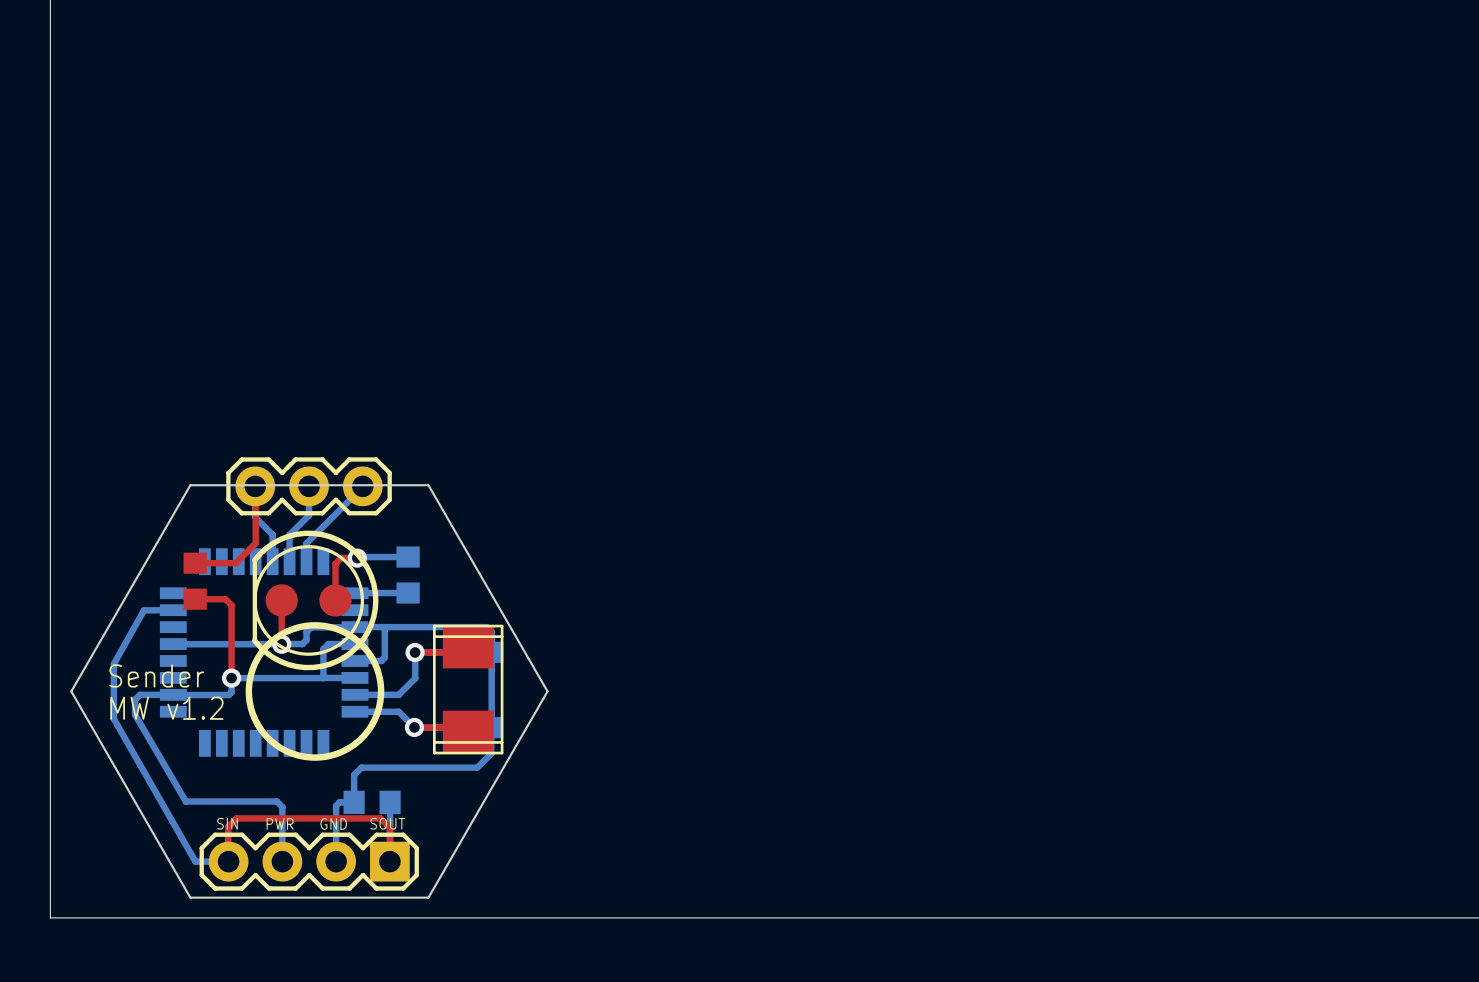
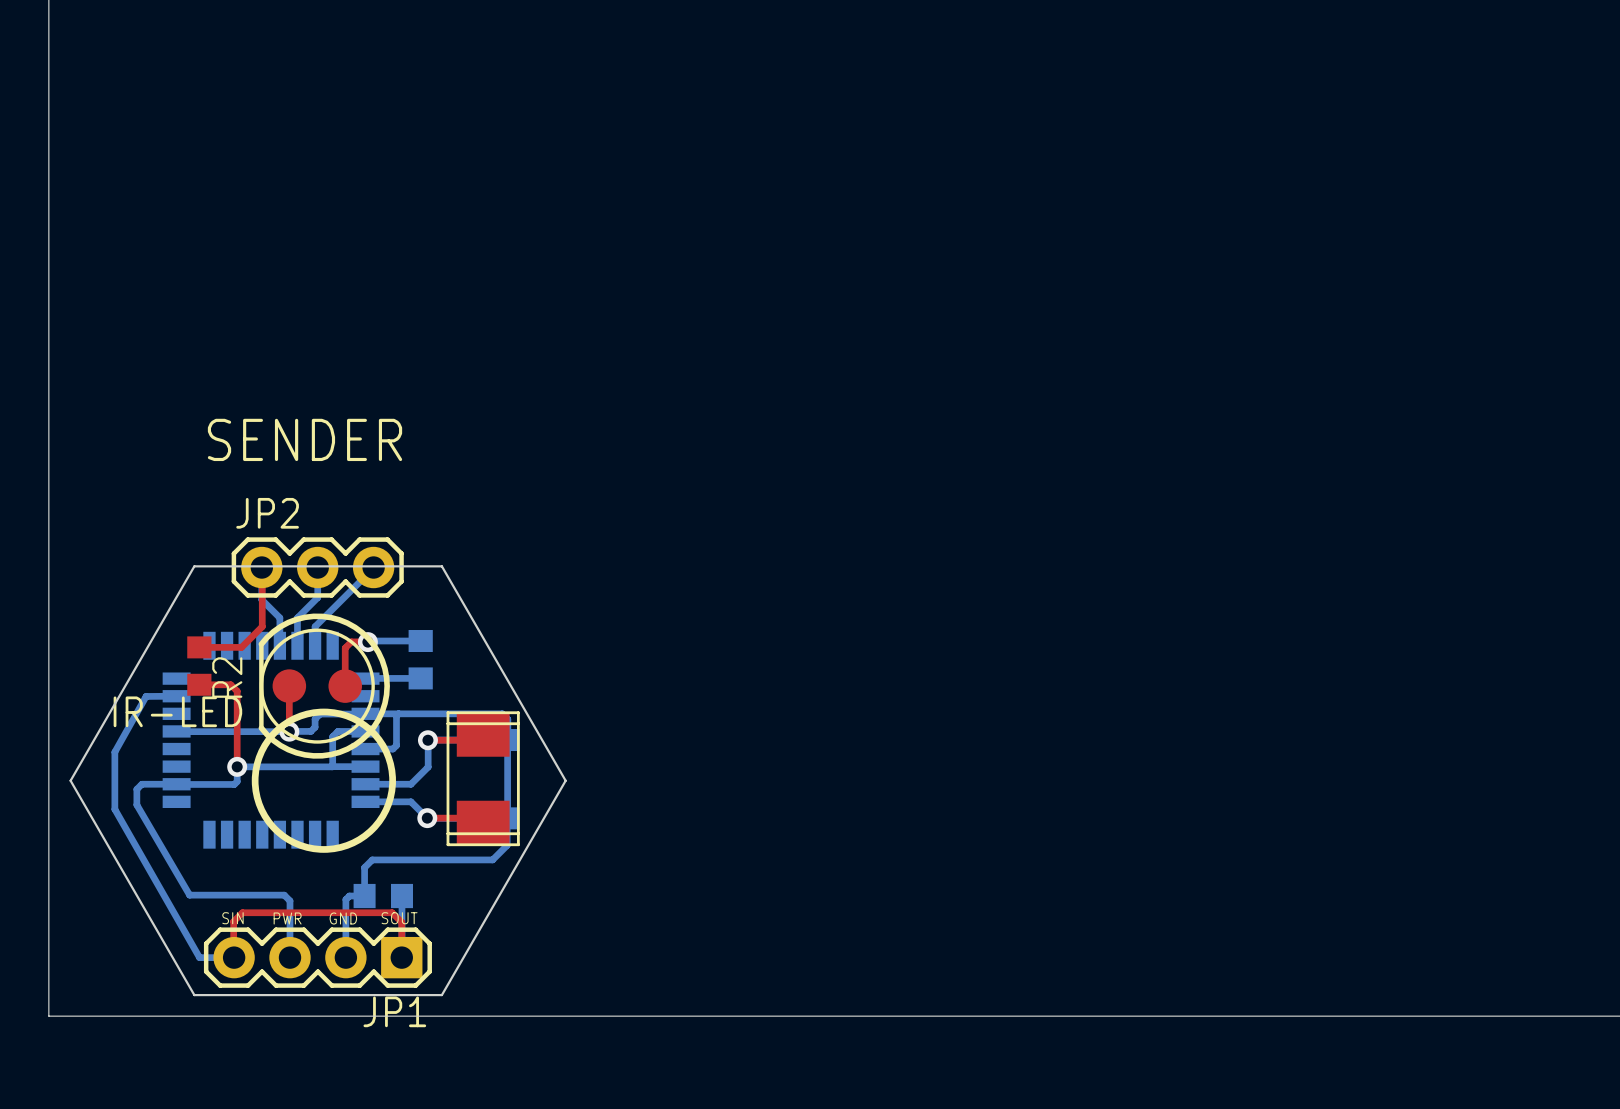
text: none -> SENDER (305, 439)
JP2 name: none -> JP2 (267, 513)
R2 name: none -> R2 (227, 677)
IR-LED name: none -> IR-LED (177, 711)
text: Sender (156, 675) -> none
text: MW v1.2 (166, 708) -> none
JP1 name: none -> JP1 (394, 1011)

